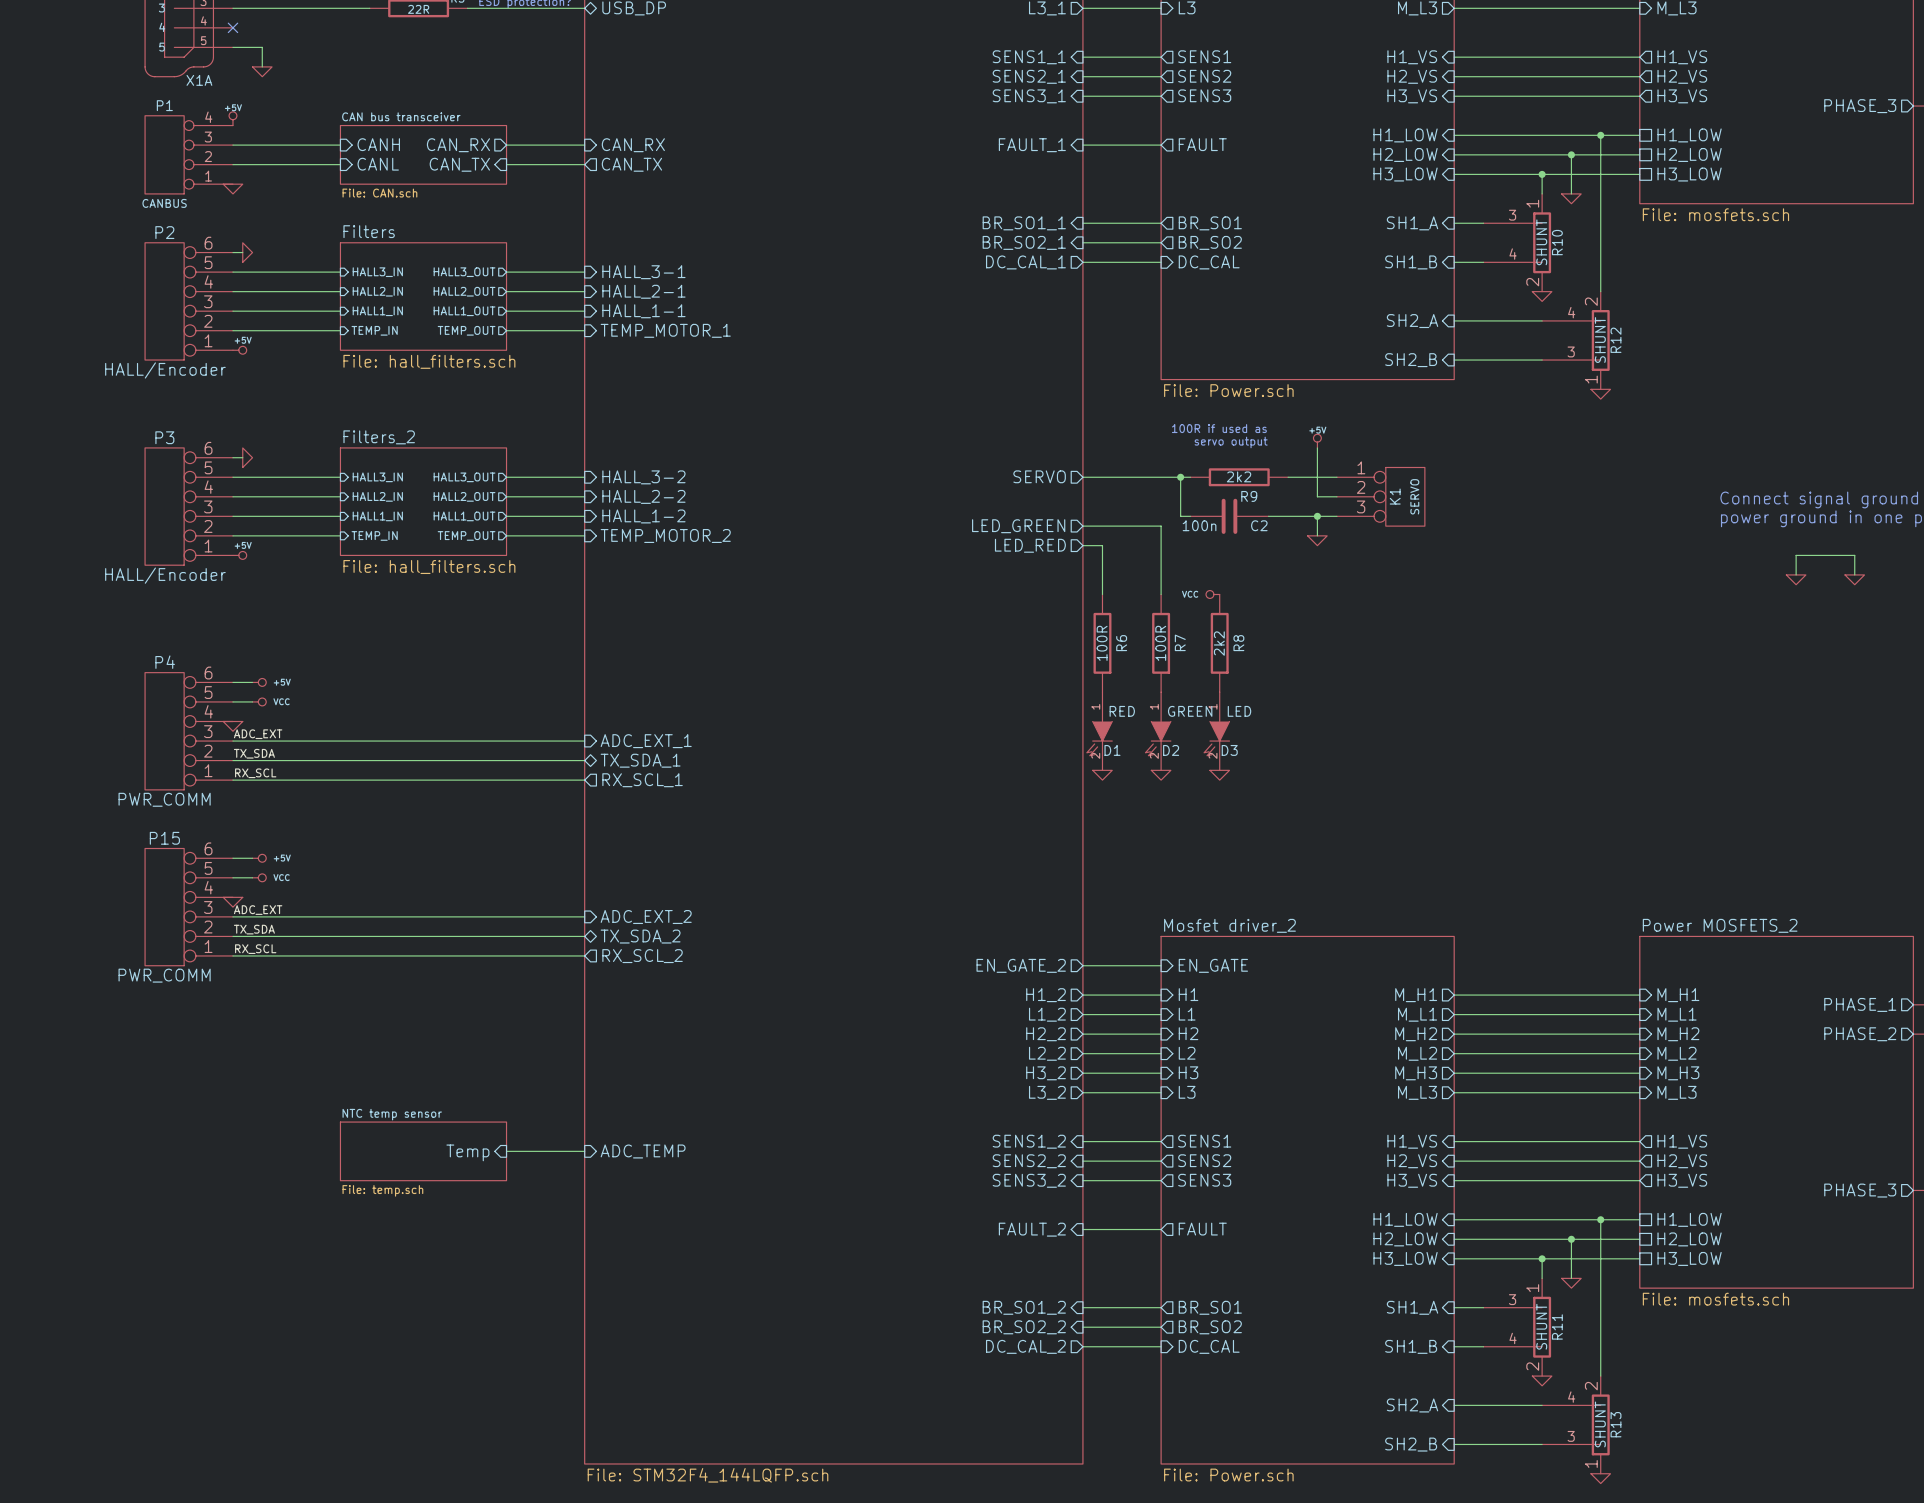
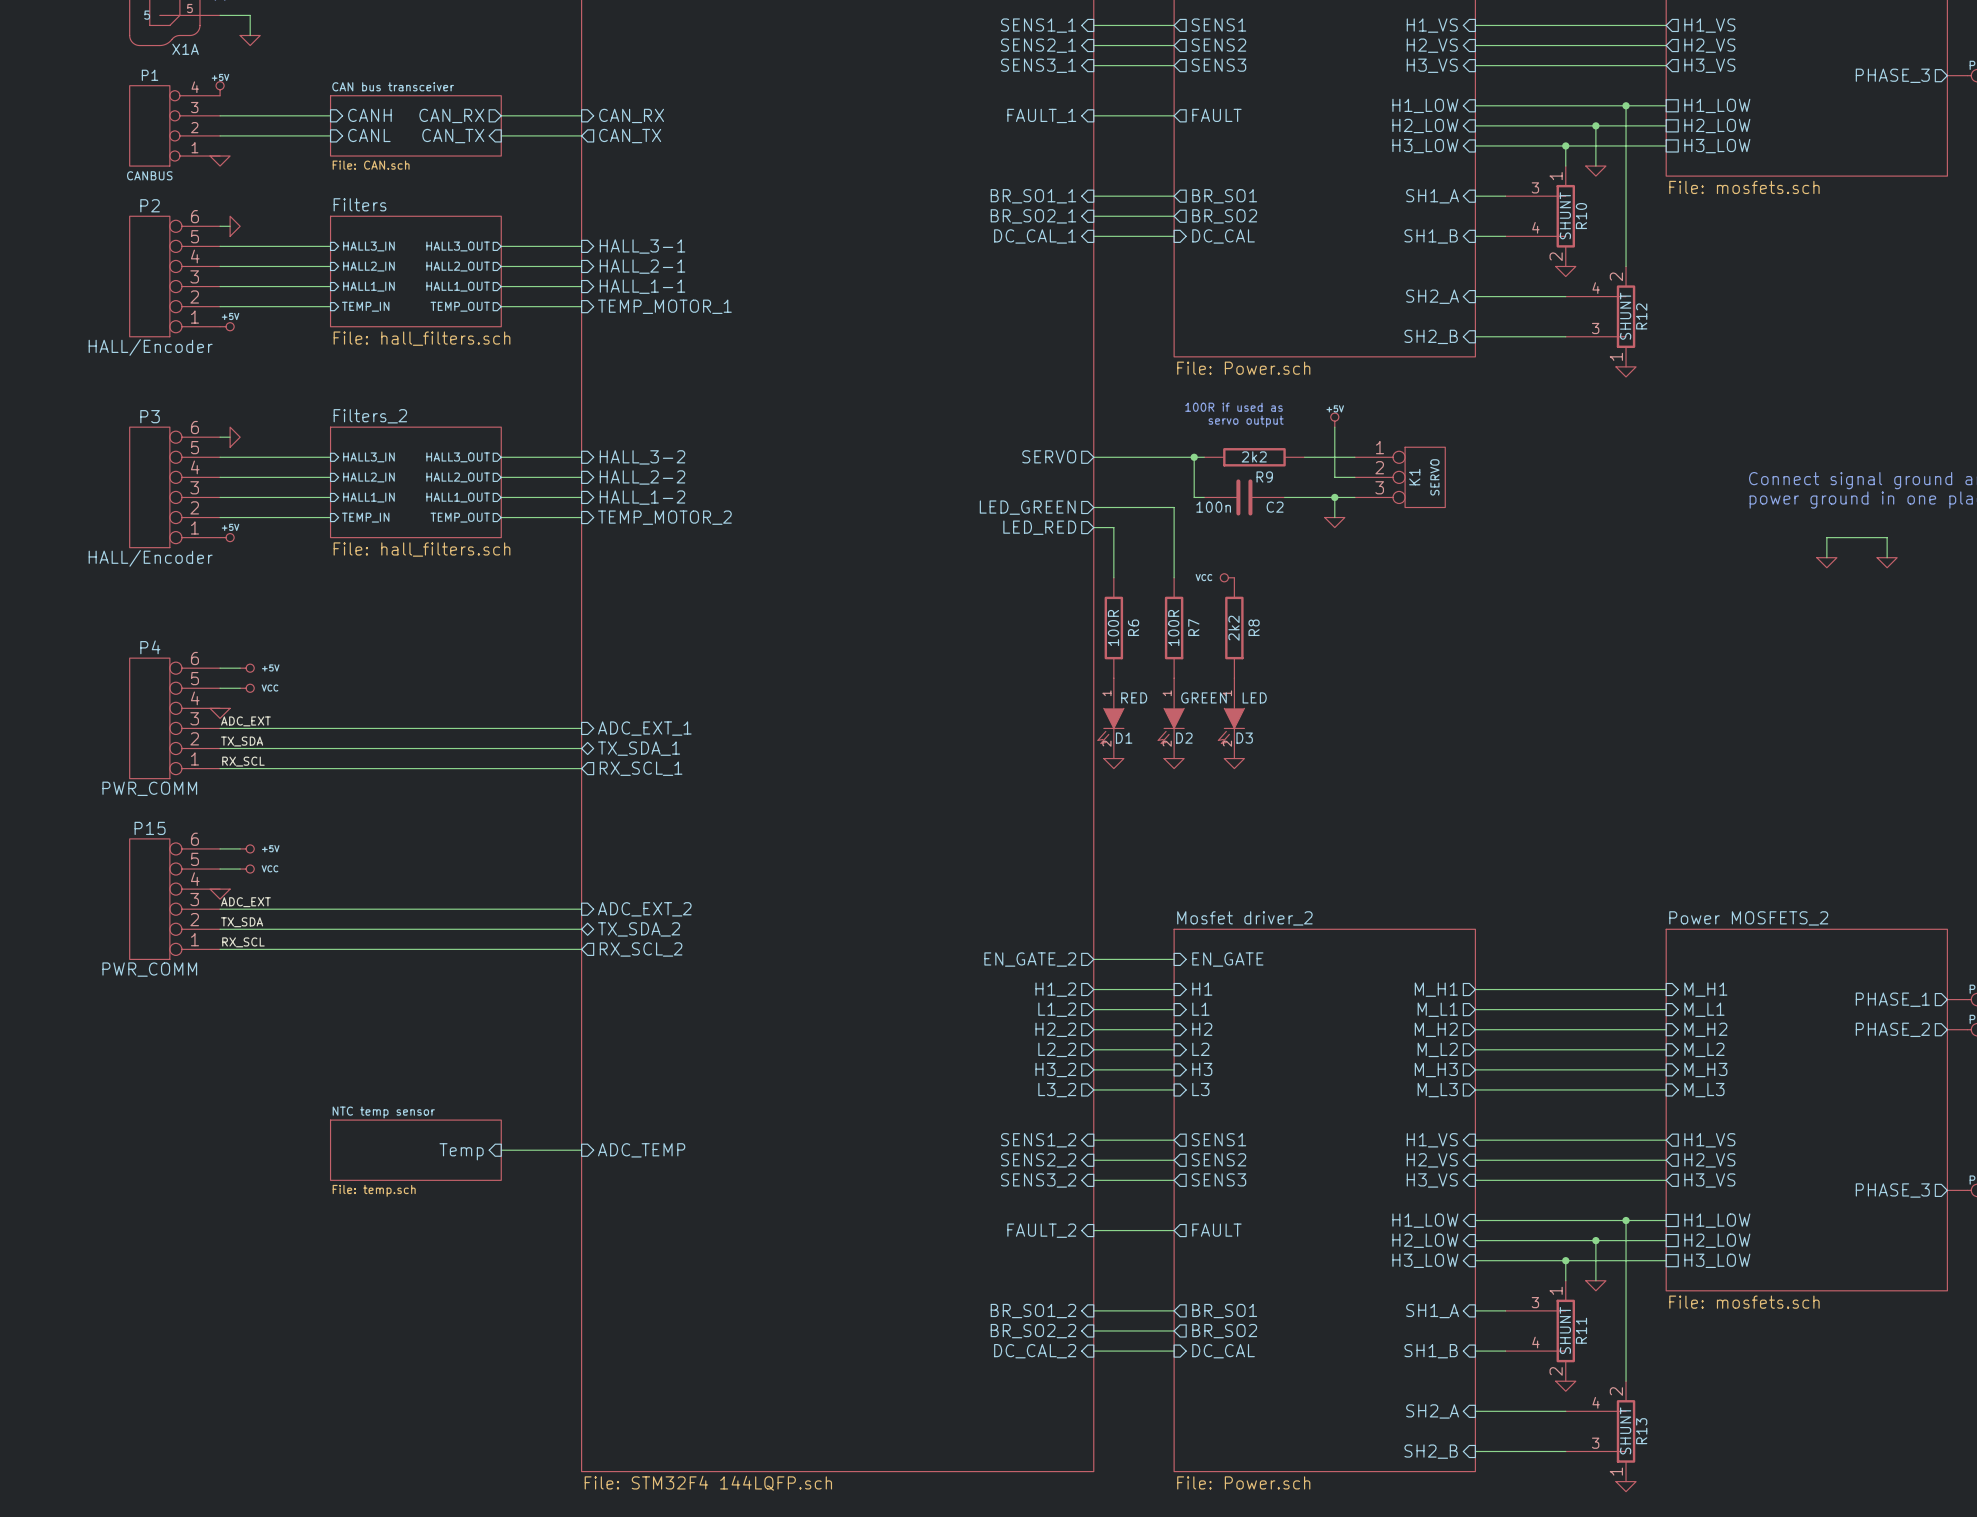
sheet pin shape: output (1025, 262) -> input (1035, 236)
sheet pin shape: output (1025, 1346) -> input (1035, 1351)
sheet value: File: STM32F4_144LQFP.sch (708, 1475) -> File: STM32F4 144LQFP.sch (708, 1483)

